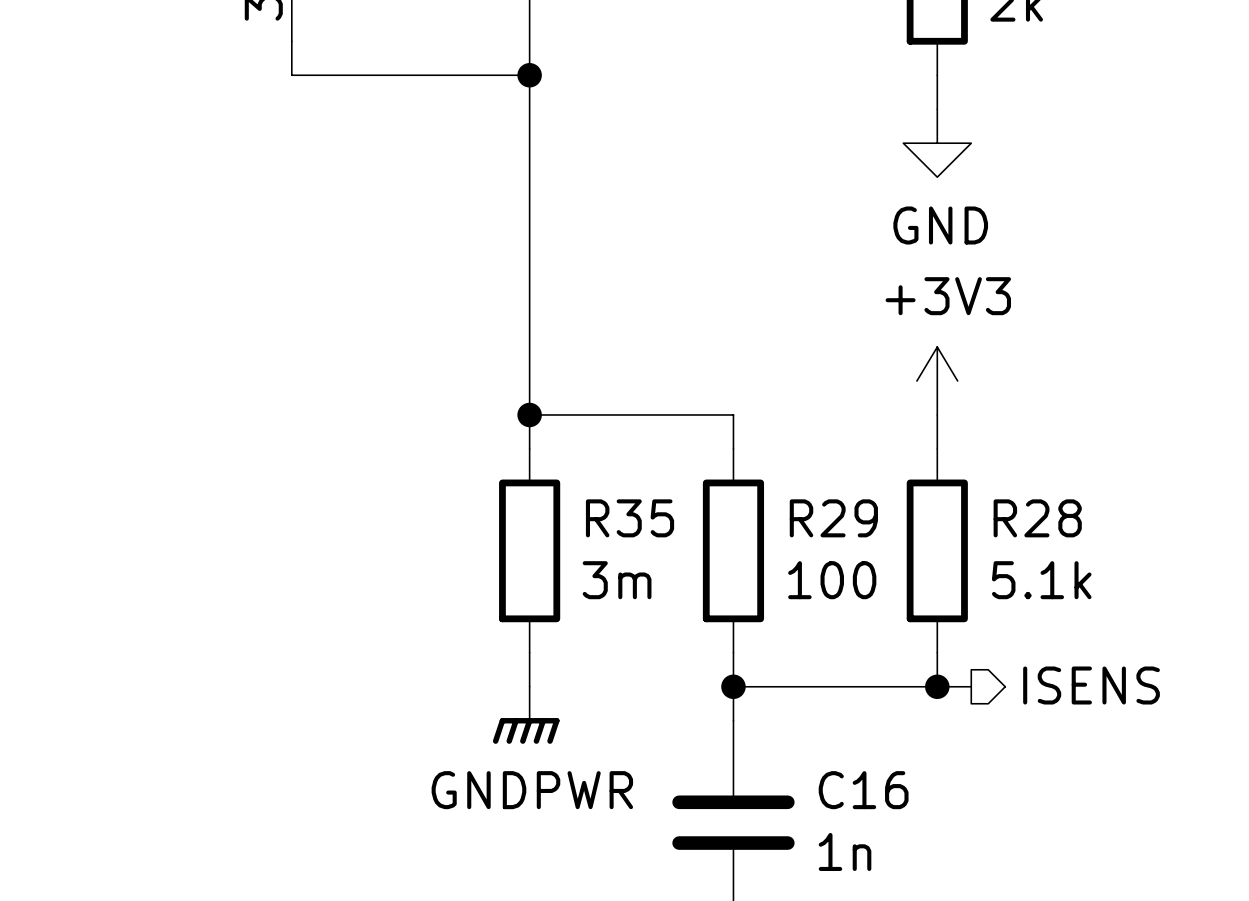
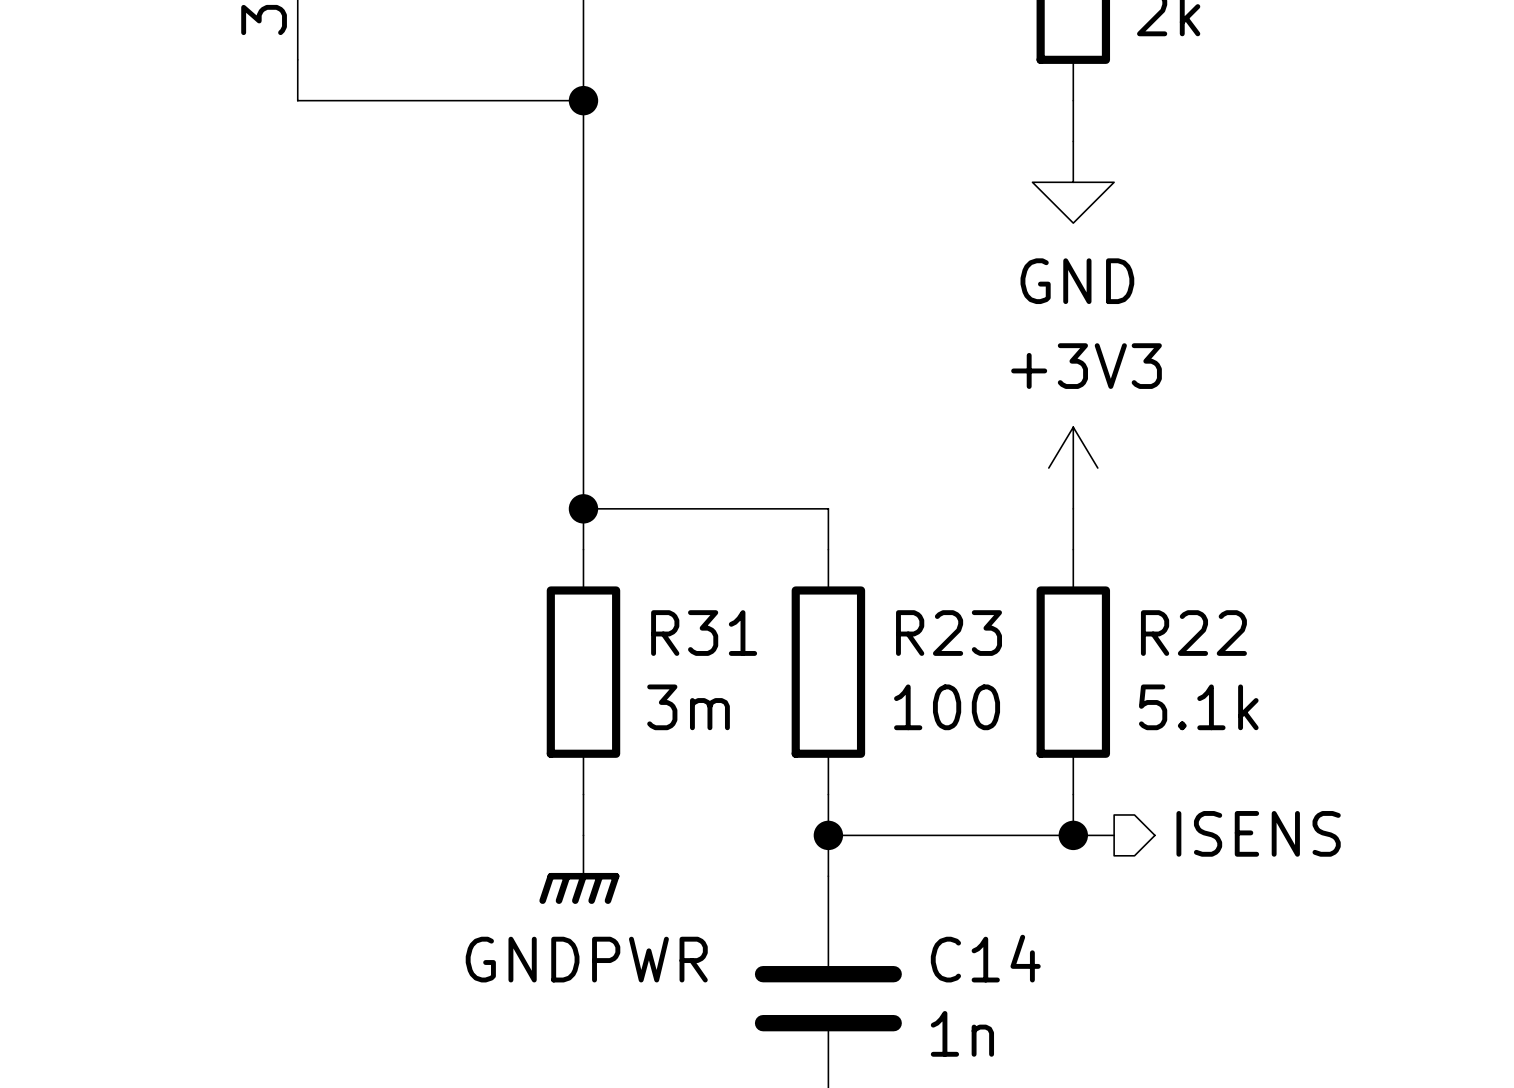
R35 name: R35 (630, 518) -> R31 (704, 633)
R29 name: R29 (833, 518) -> R23 (949, 633)
R28 name: R28 (1037, 518) -> R22 (1193, 633)
C16 name: C16 (863, 790) -> C14 (985, 958)

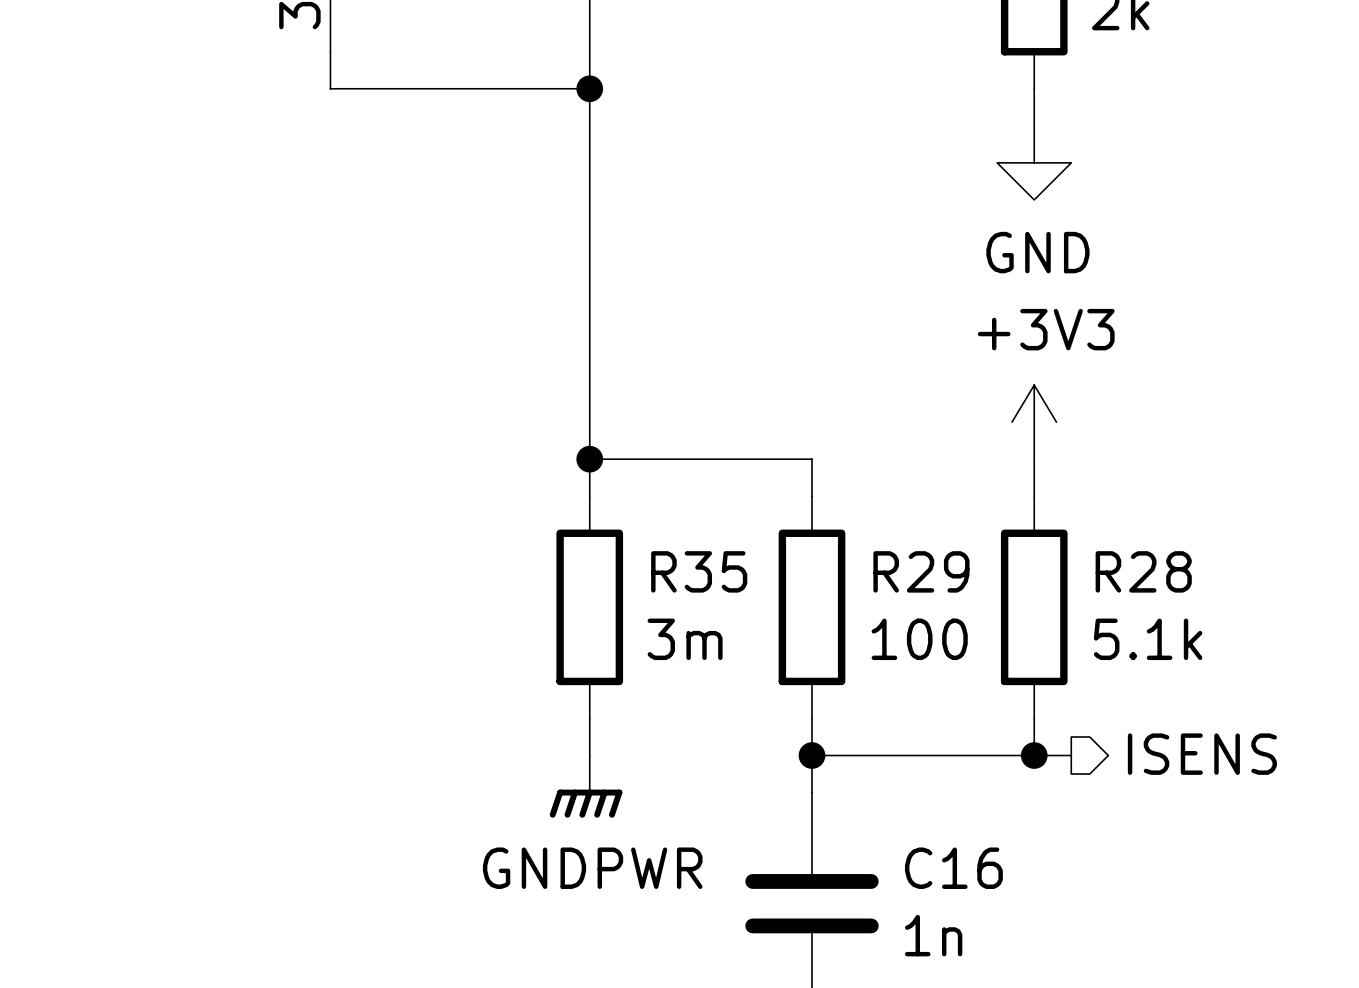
R31 name: R31 (704, 633) -> R35 (699, 571)
R23 name: R23 (949, 633) -> R29 (921, 571)
R22 name: R22 (1193, 633) -> R28 (1143, 571)
C14 name: C14 (985, 958) -> C16 (953, 868)

